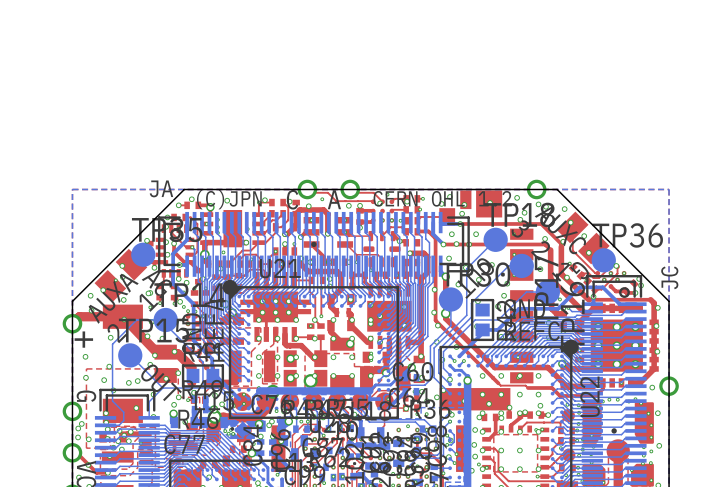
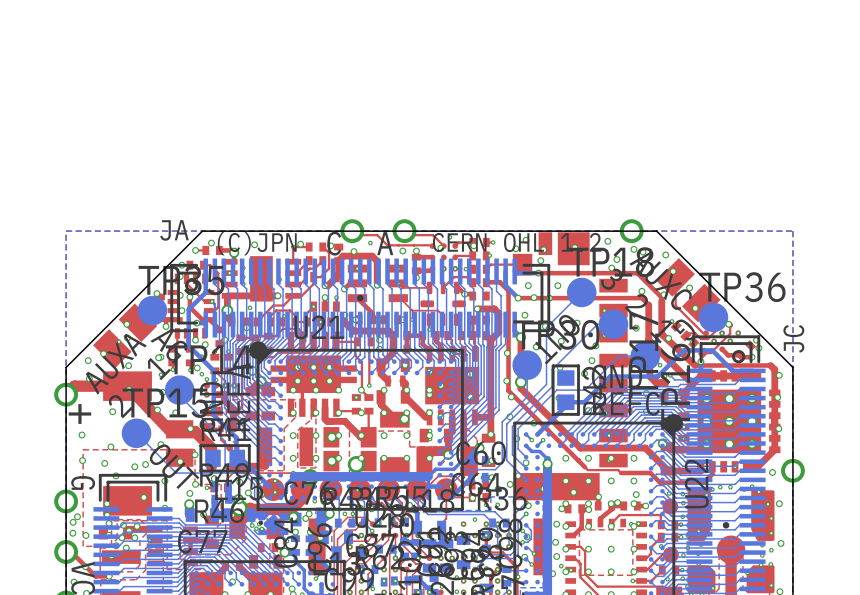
bottom track: (165, 320) (136, 320) (112, 344) (112, 401) (123, 412) (123, 420) (119, 425) (105, 425) -> none
via: (154, 355) -> none
bottom track: (162, 388) (149, 401) (149, 417) -> none

